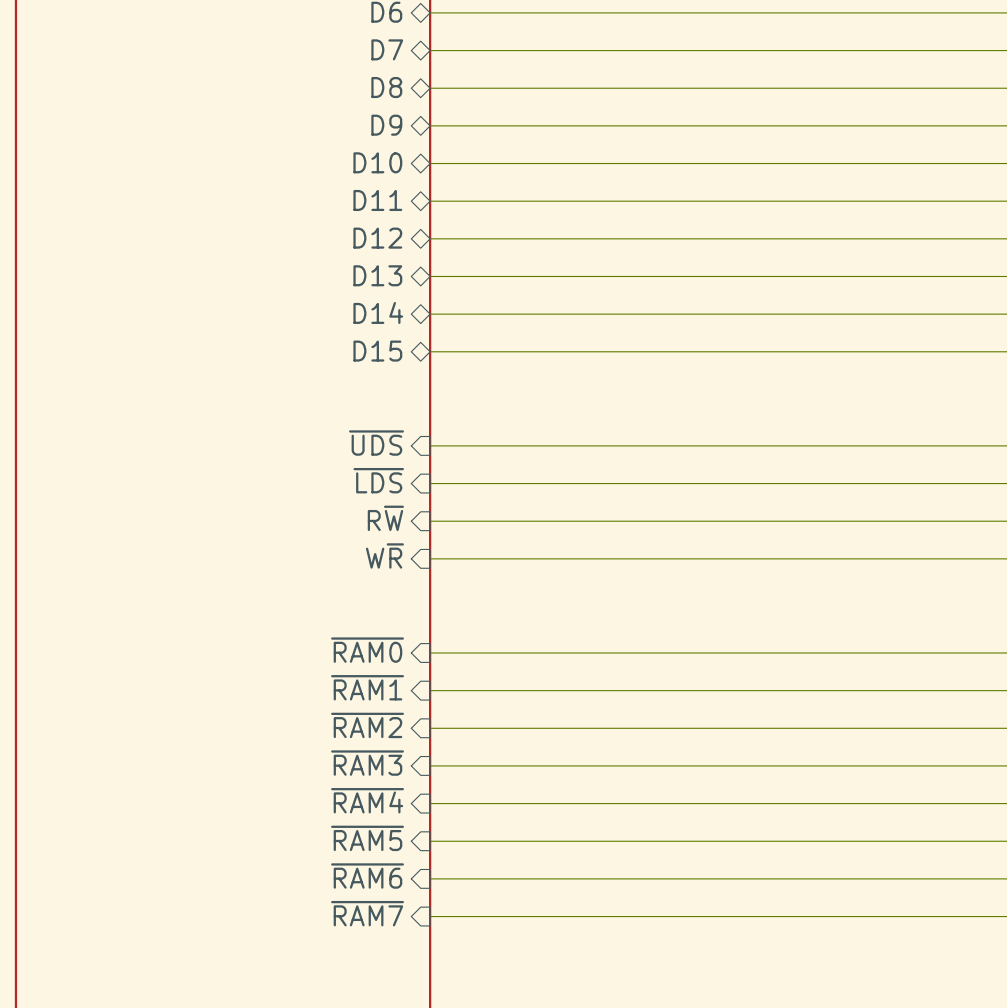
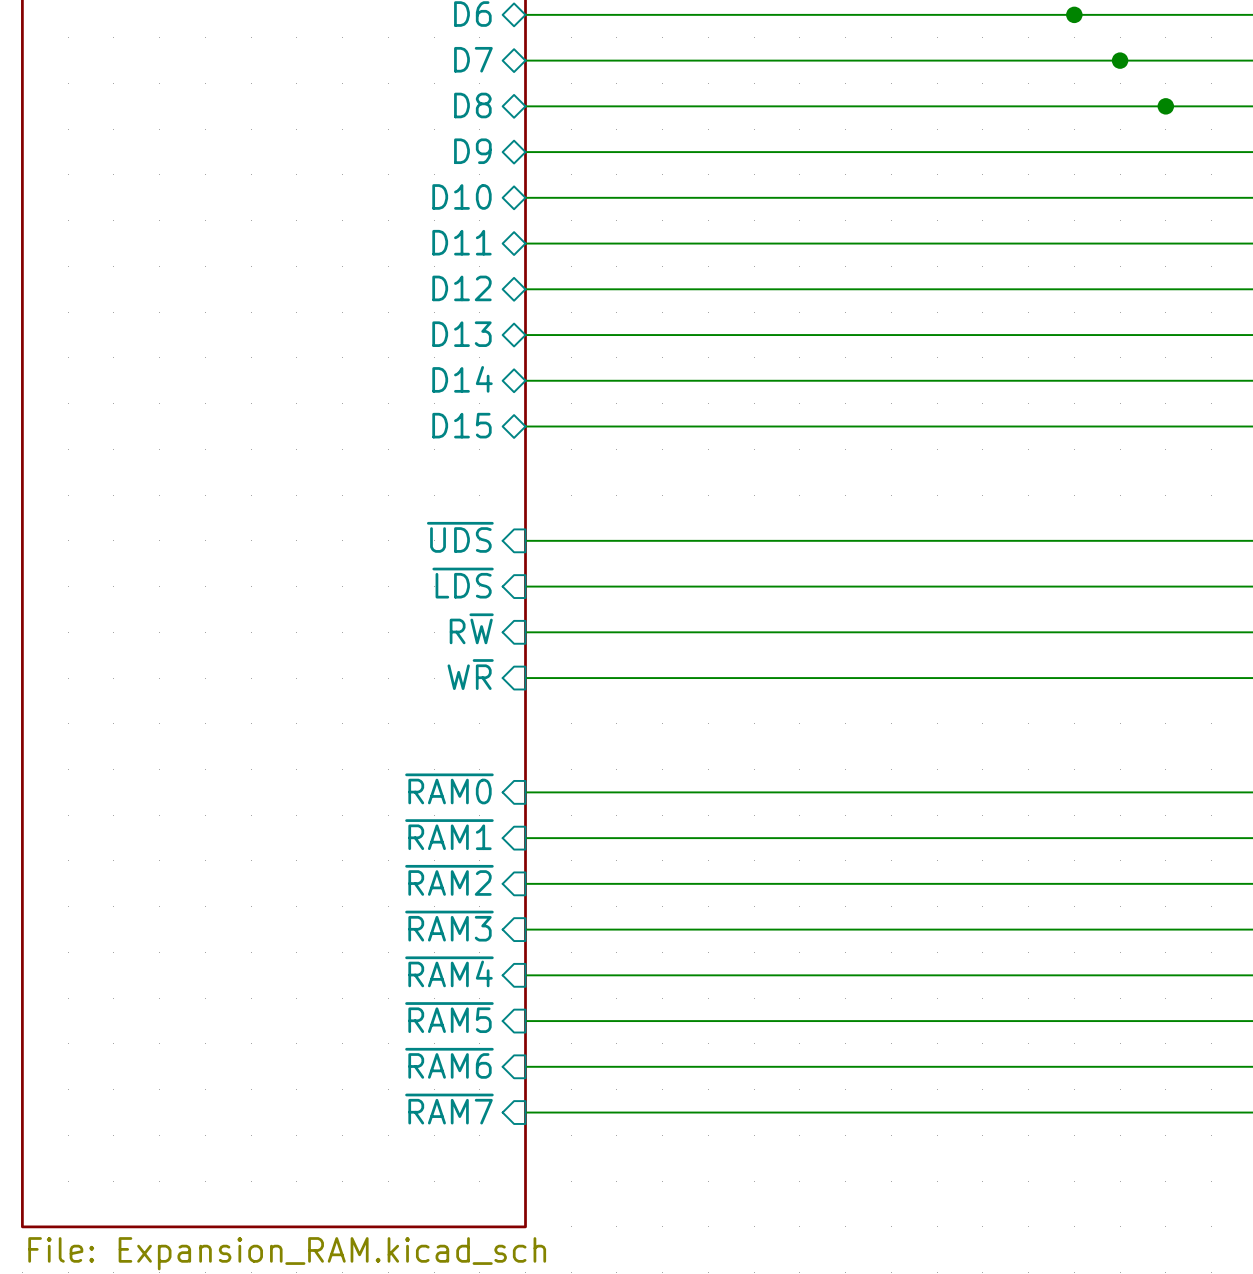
junction: none -> (1074, 14)
junction: none -> (1120, 60)
junction: none -> (1165, 106)

